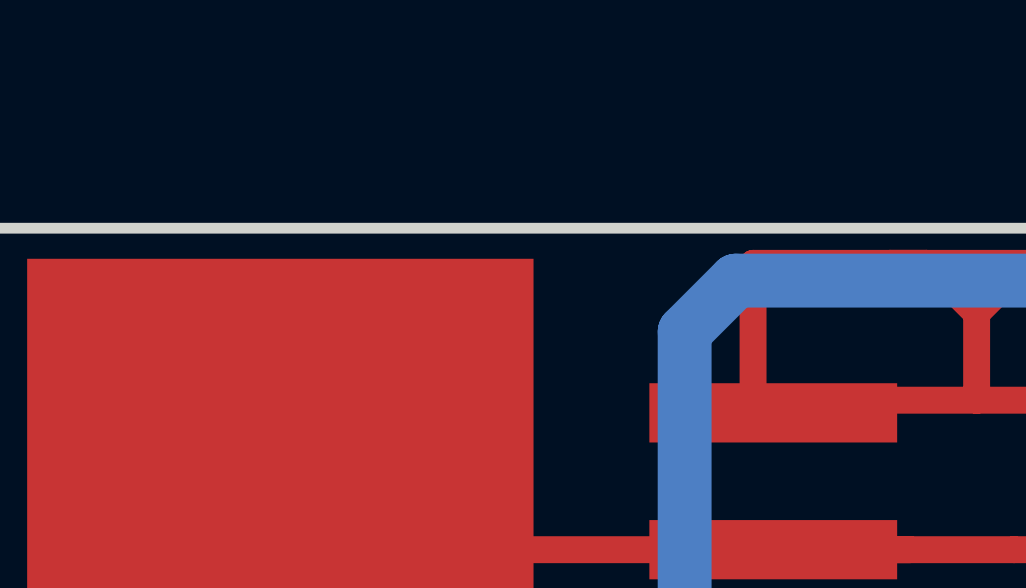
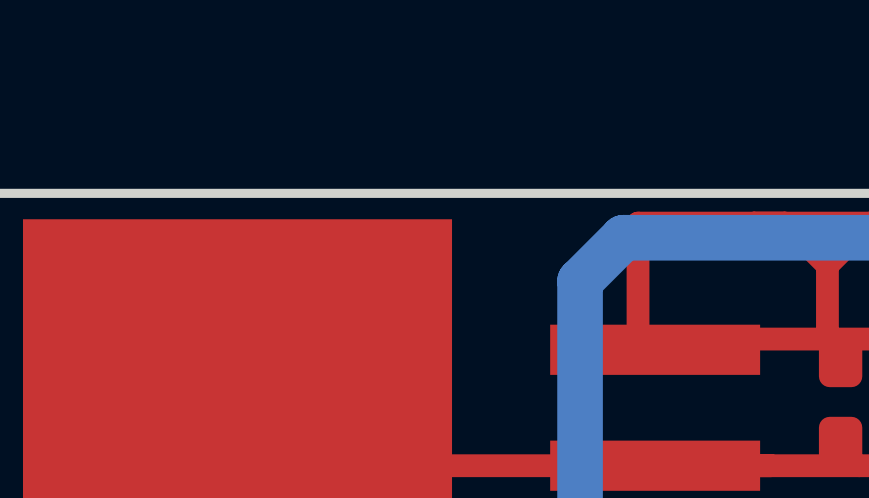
part: none -> (840, 401)

